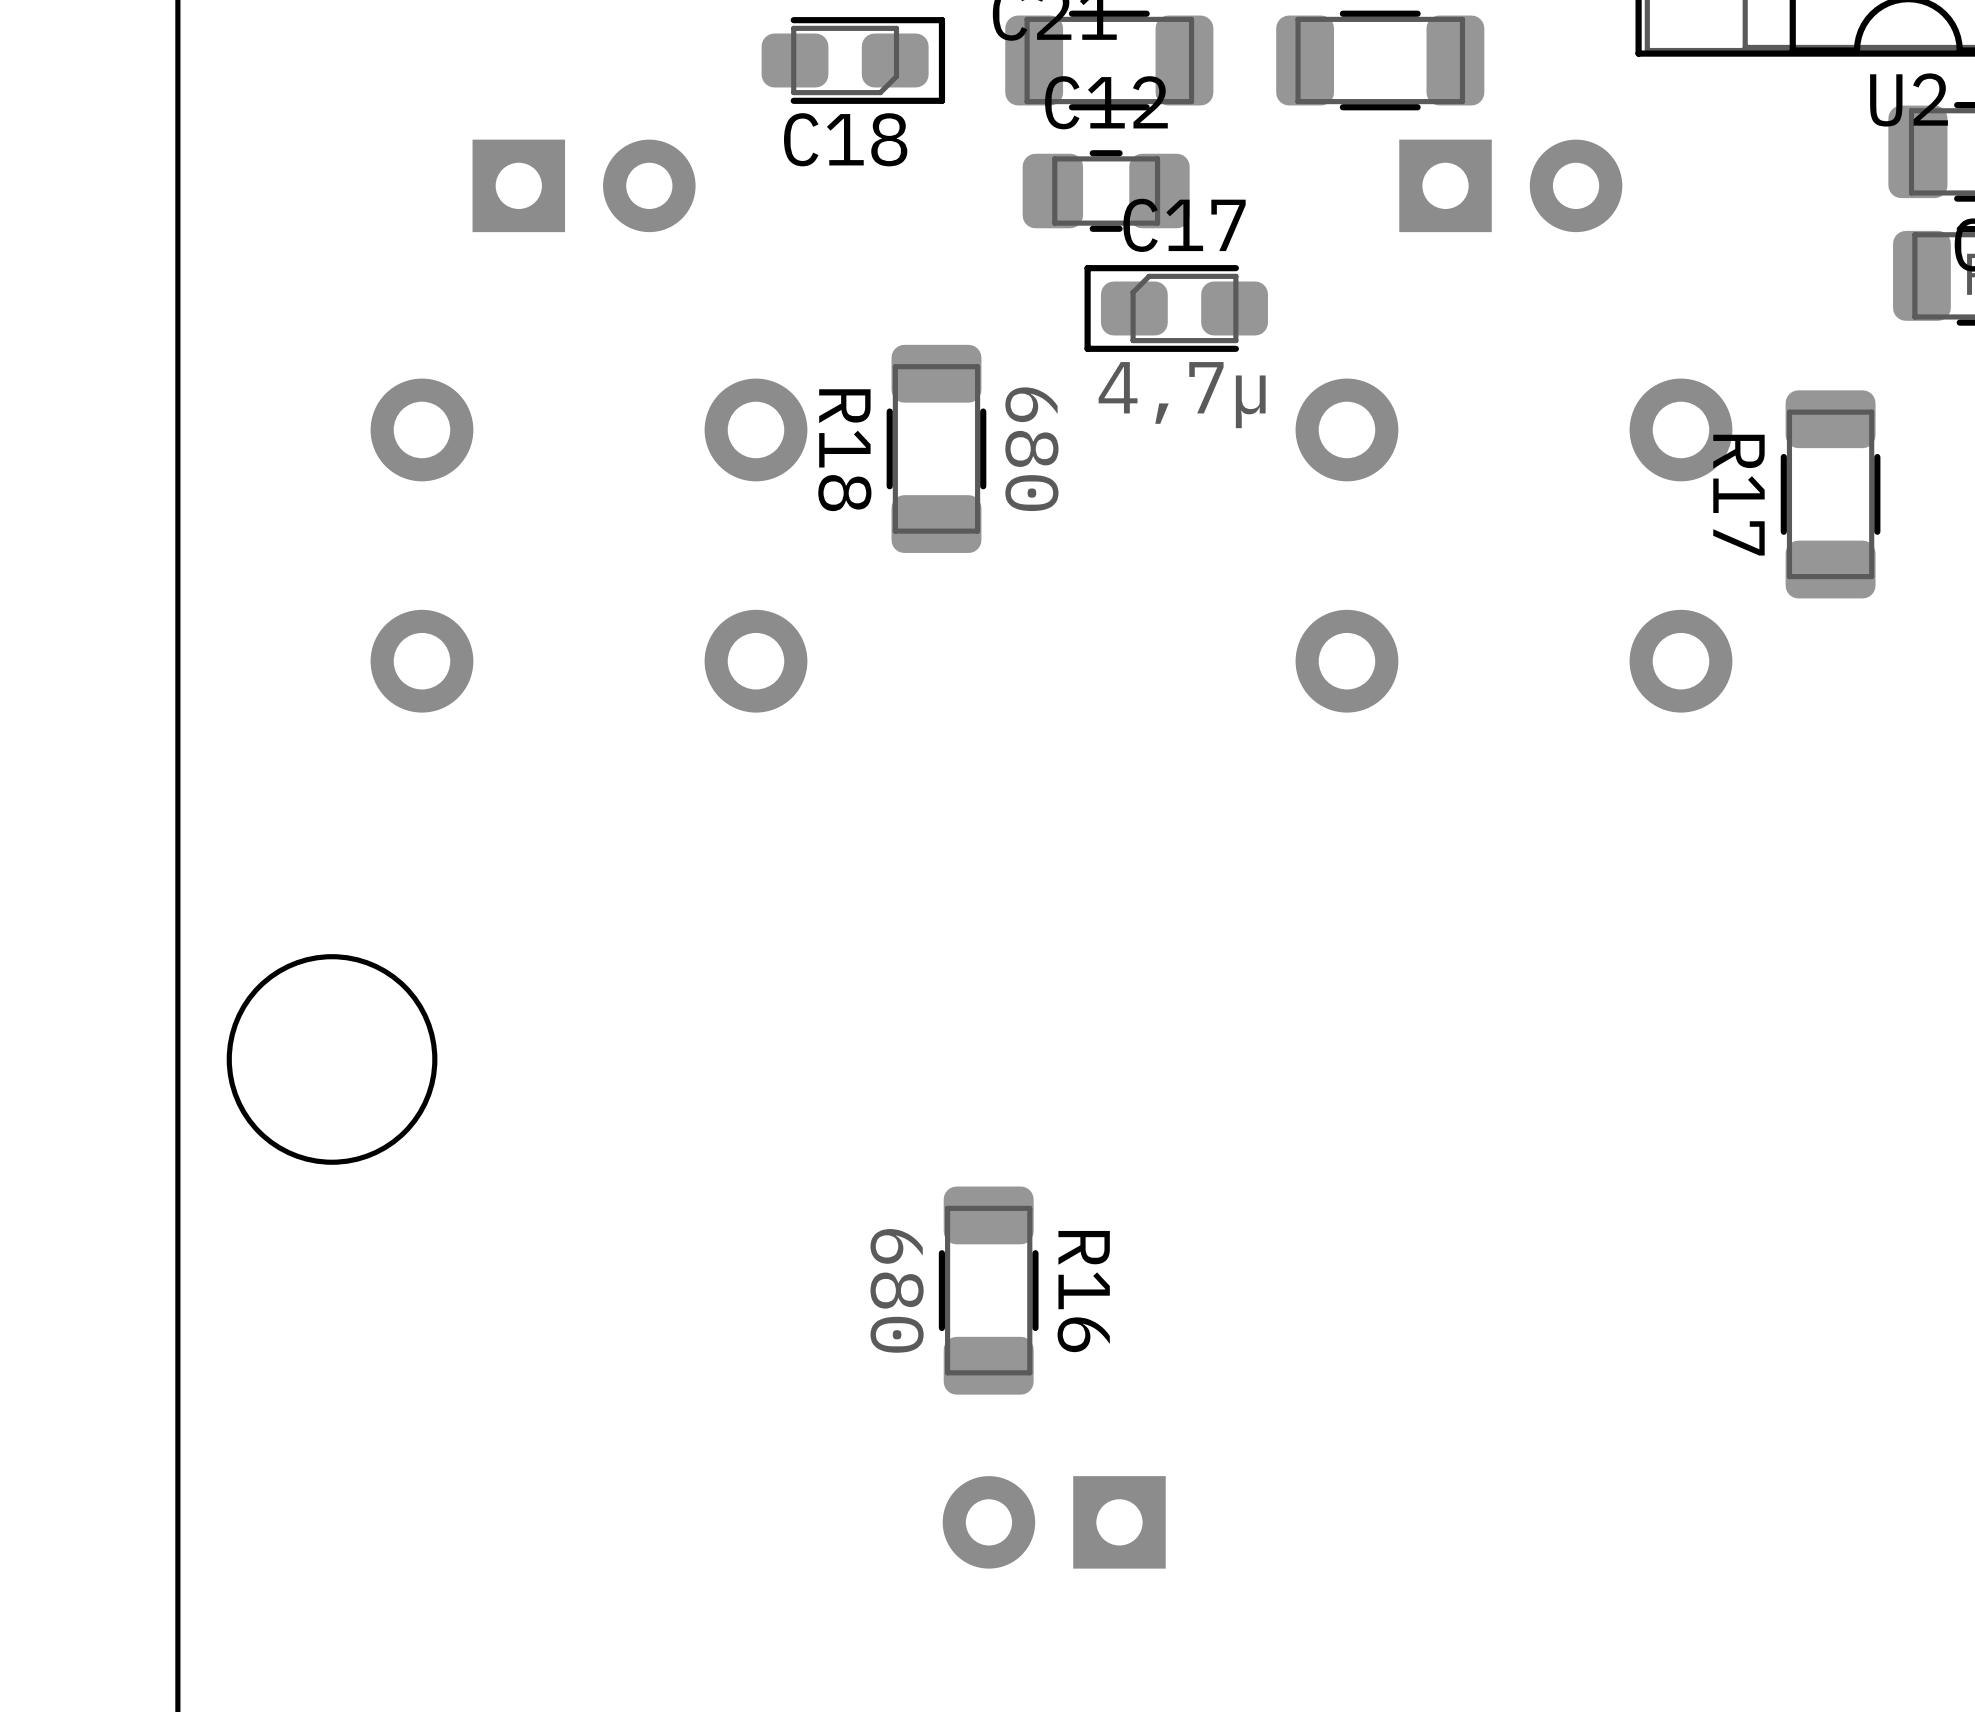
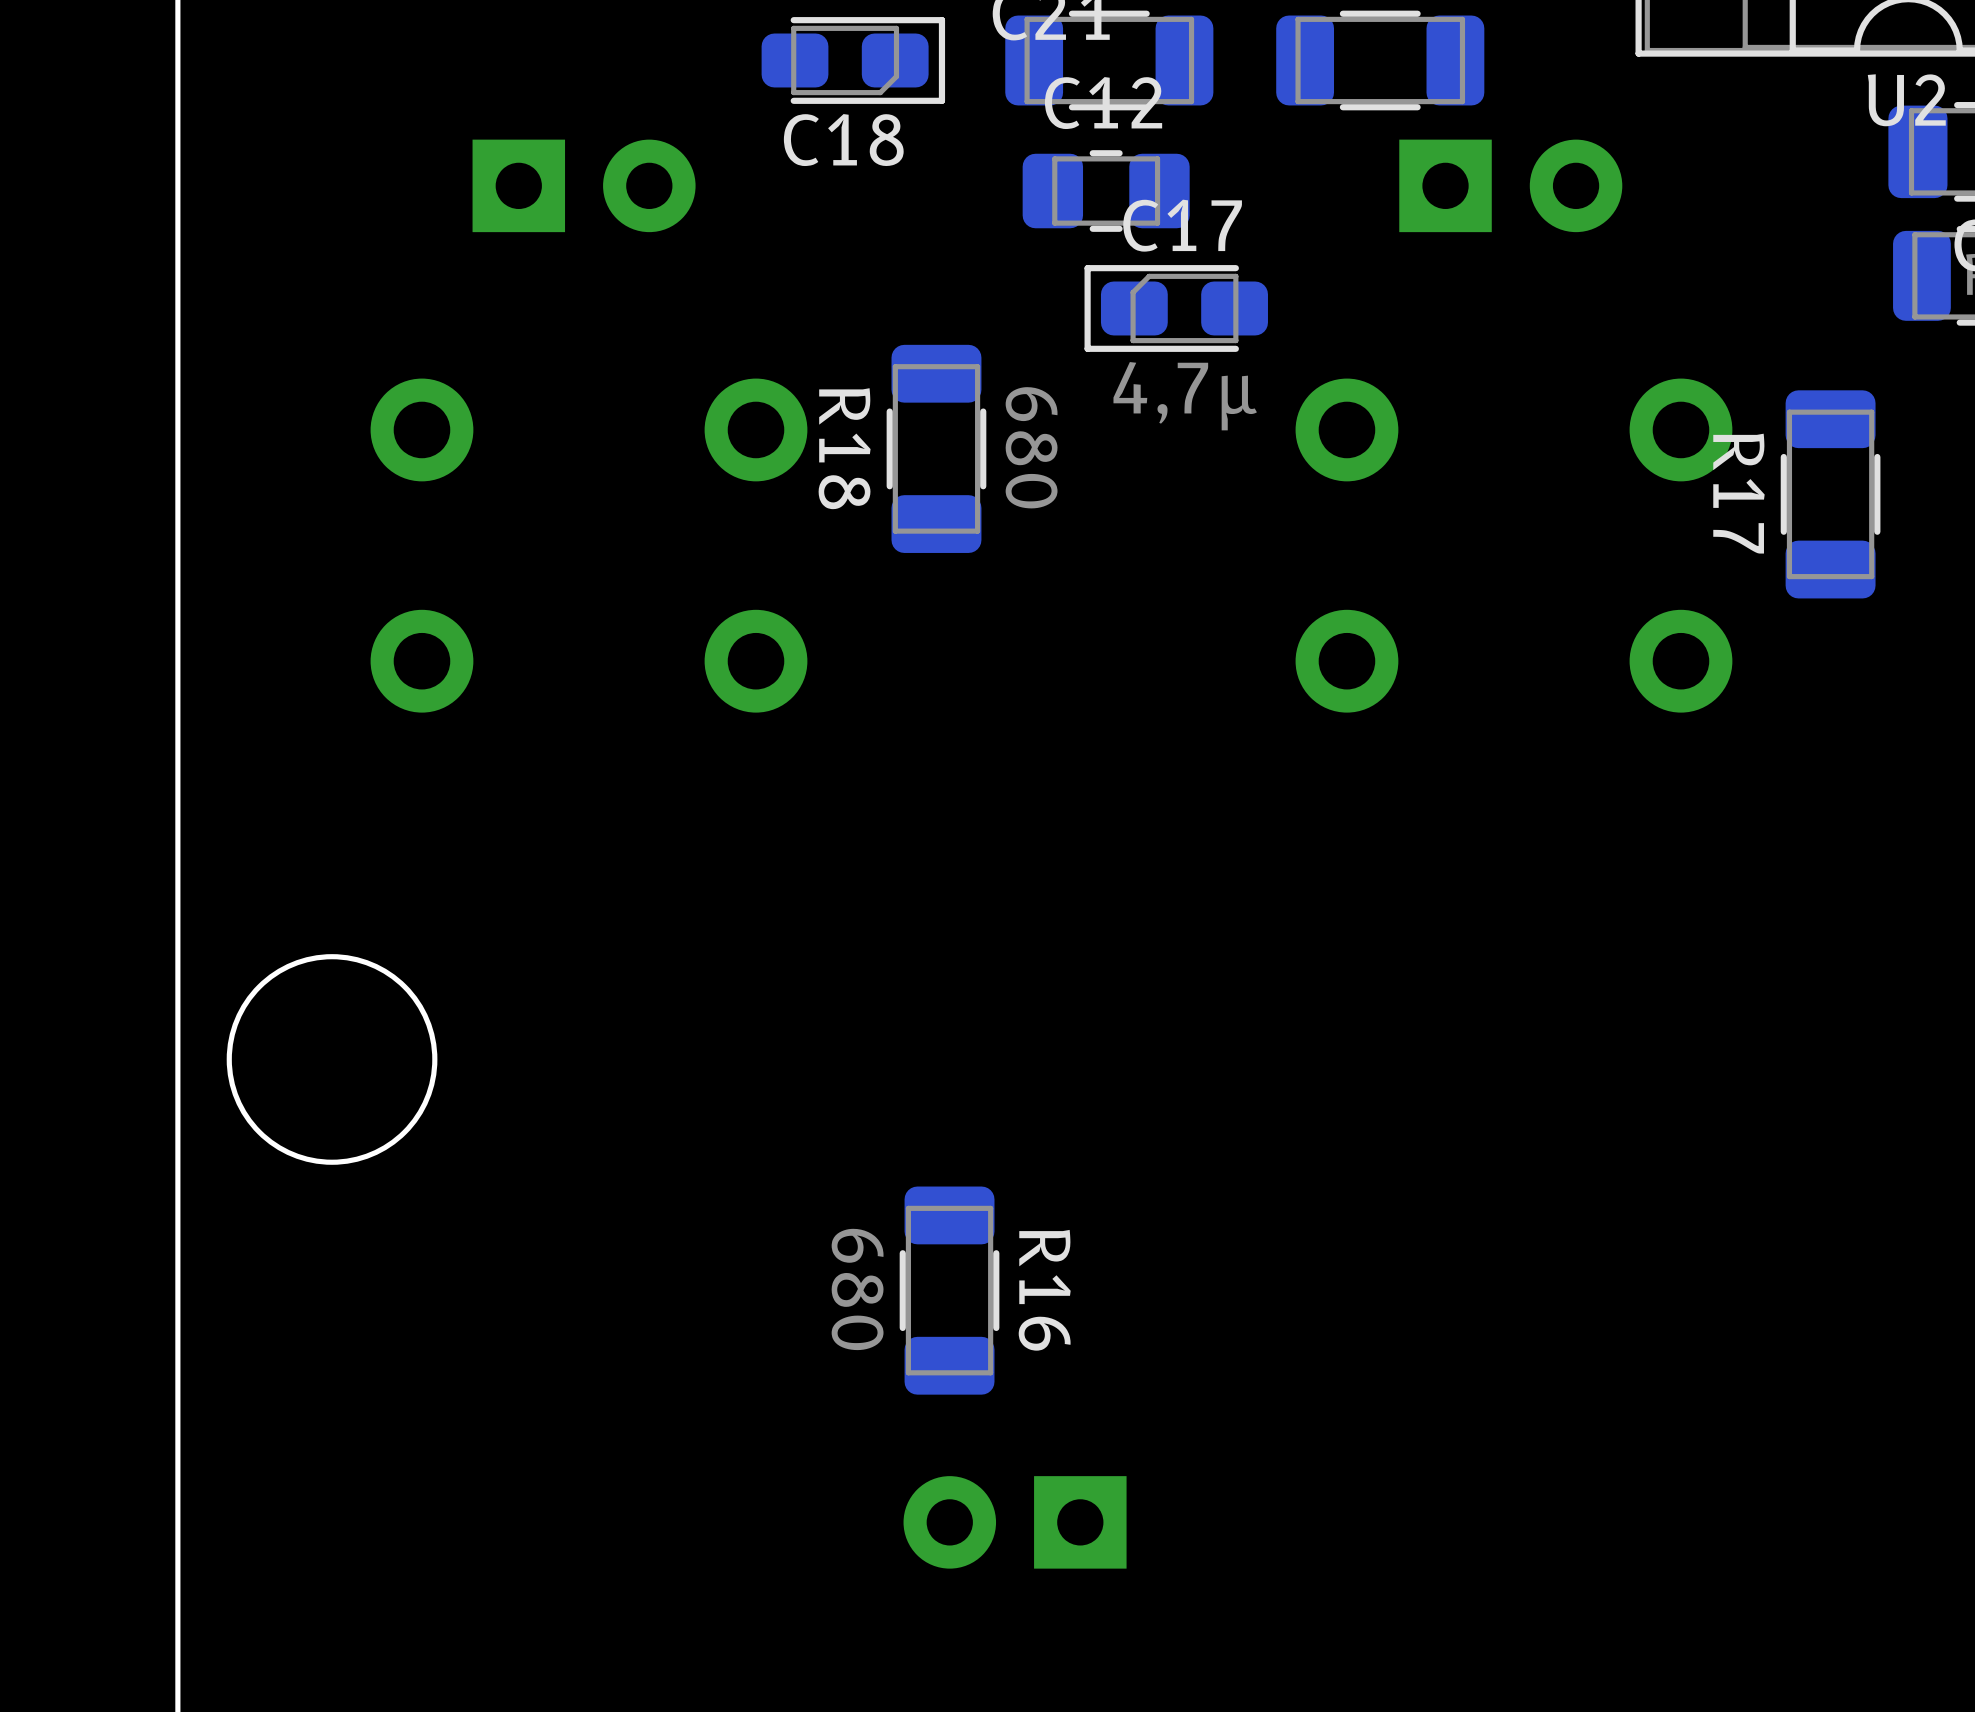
R16 position: (988, 1290) -> (949, 1290)
part position: (1054, 1522) -> (1015, 1522)

